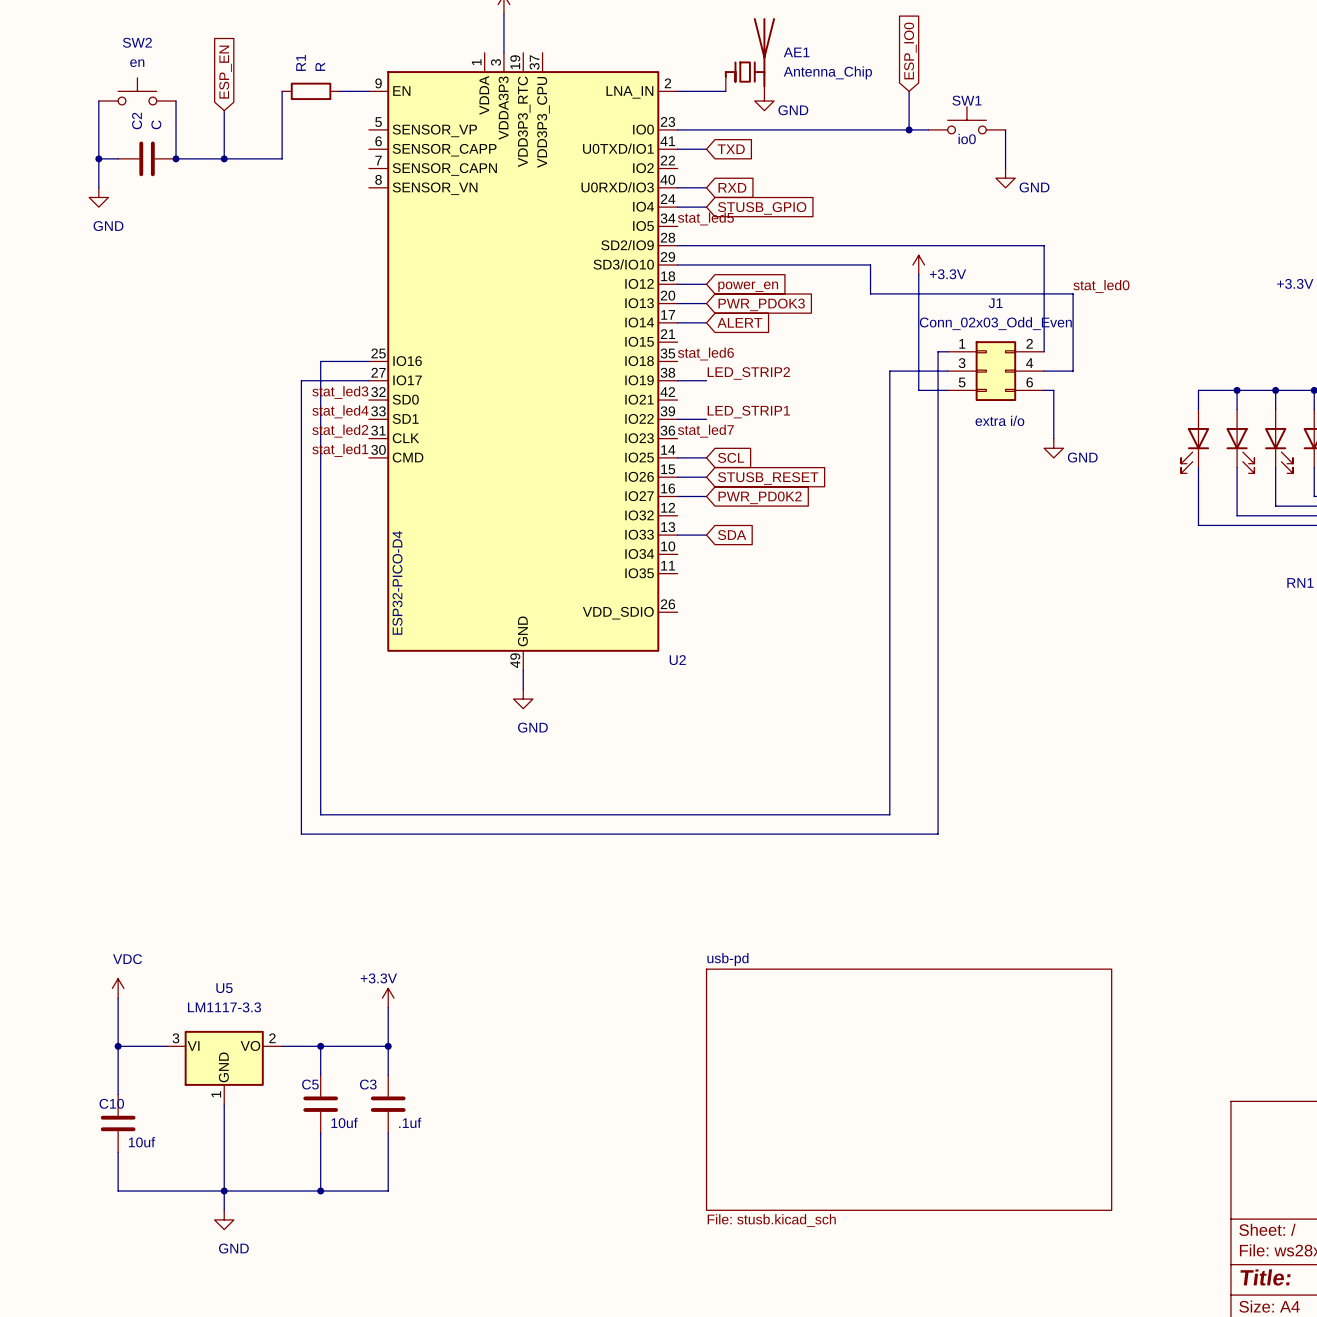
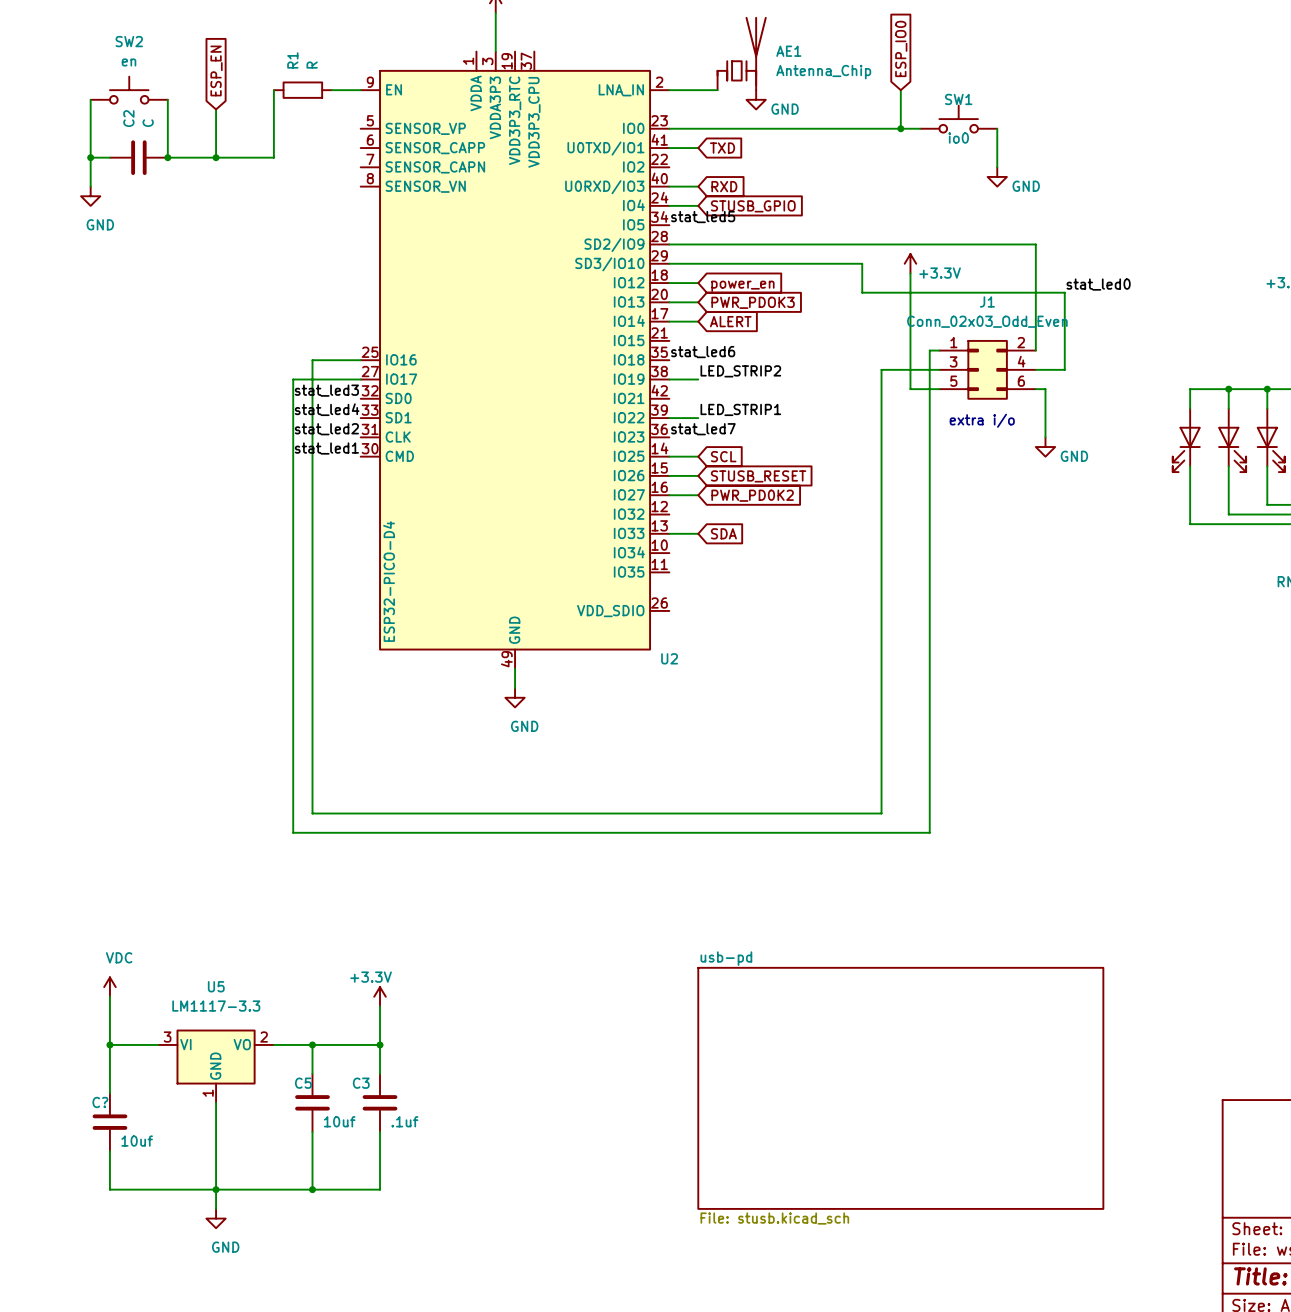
C10 name: C10 (111, 1103) -> C? (100, 1102)

